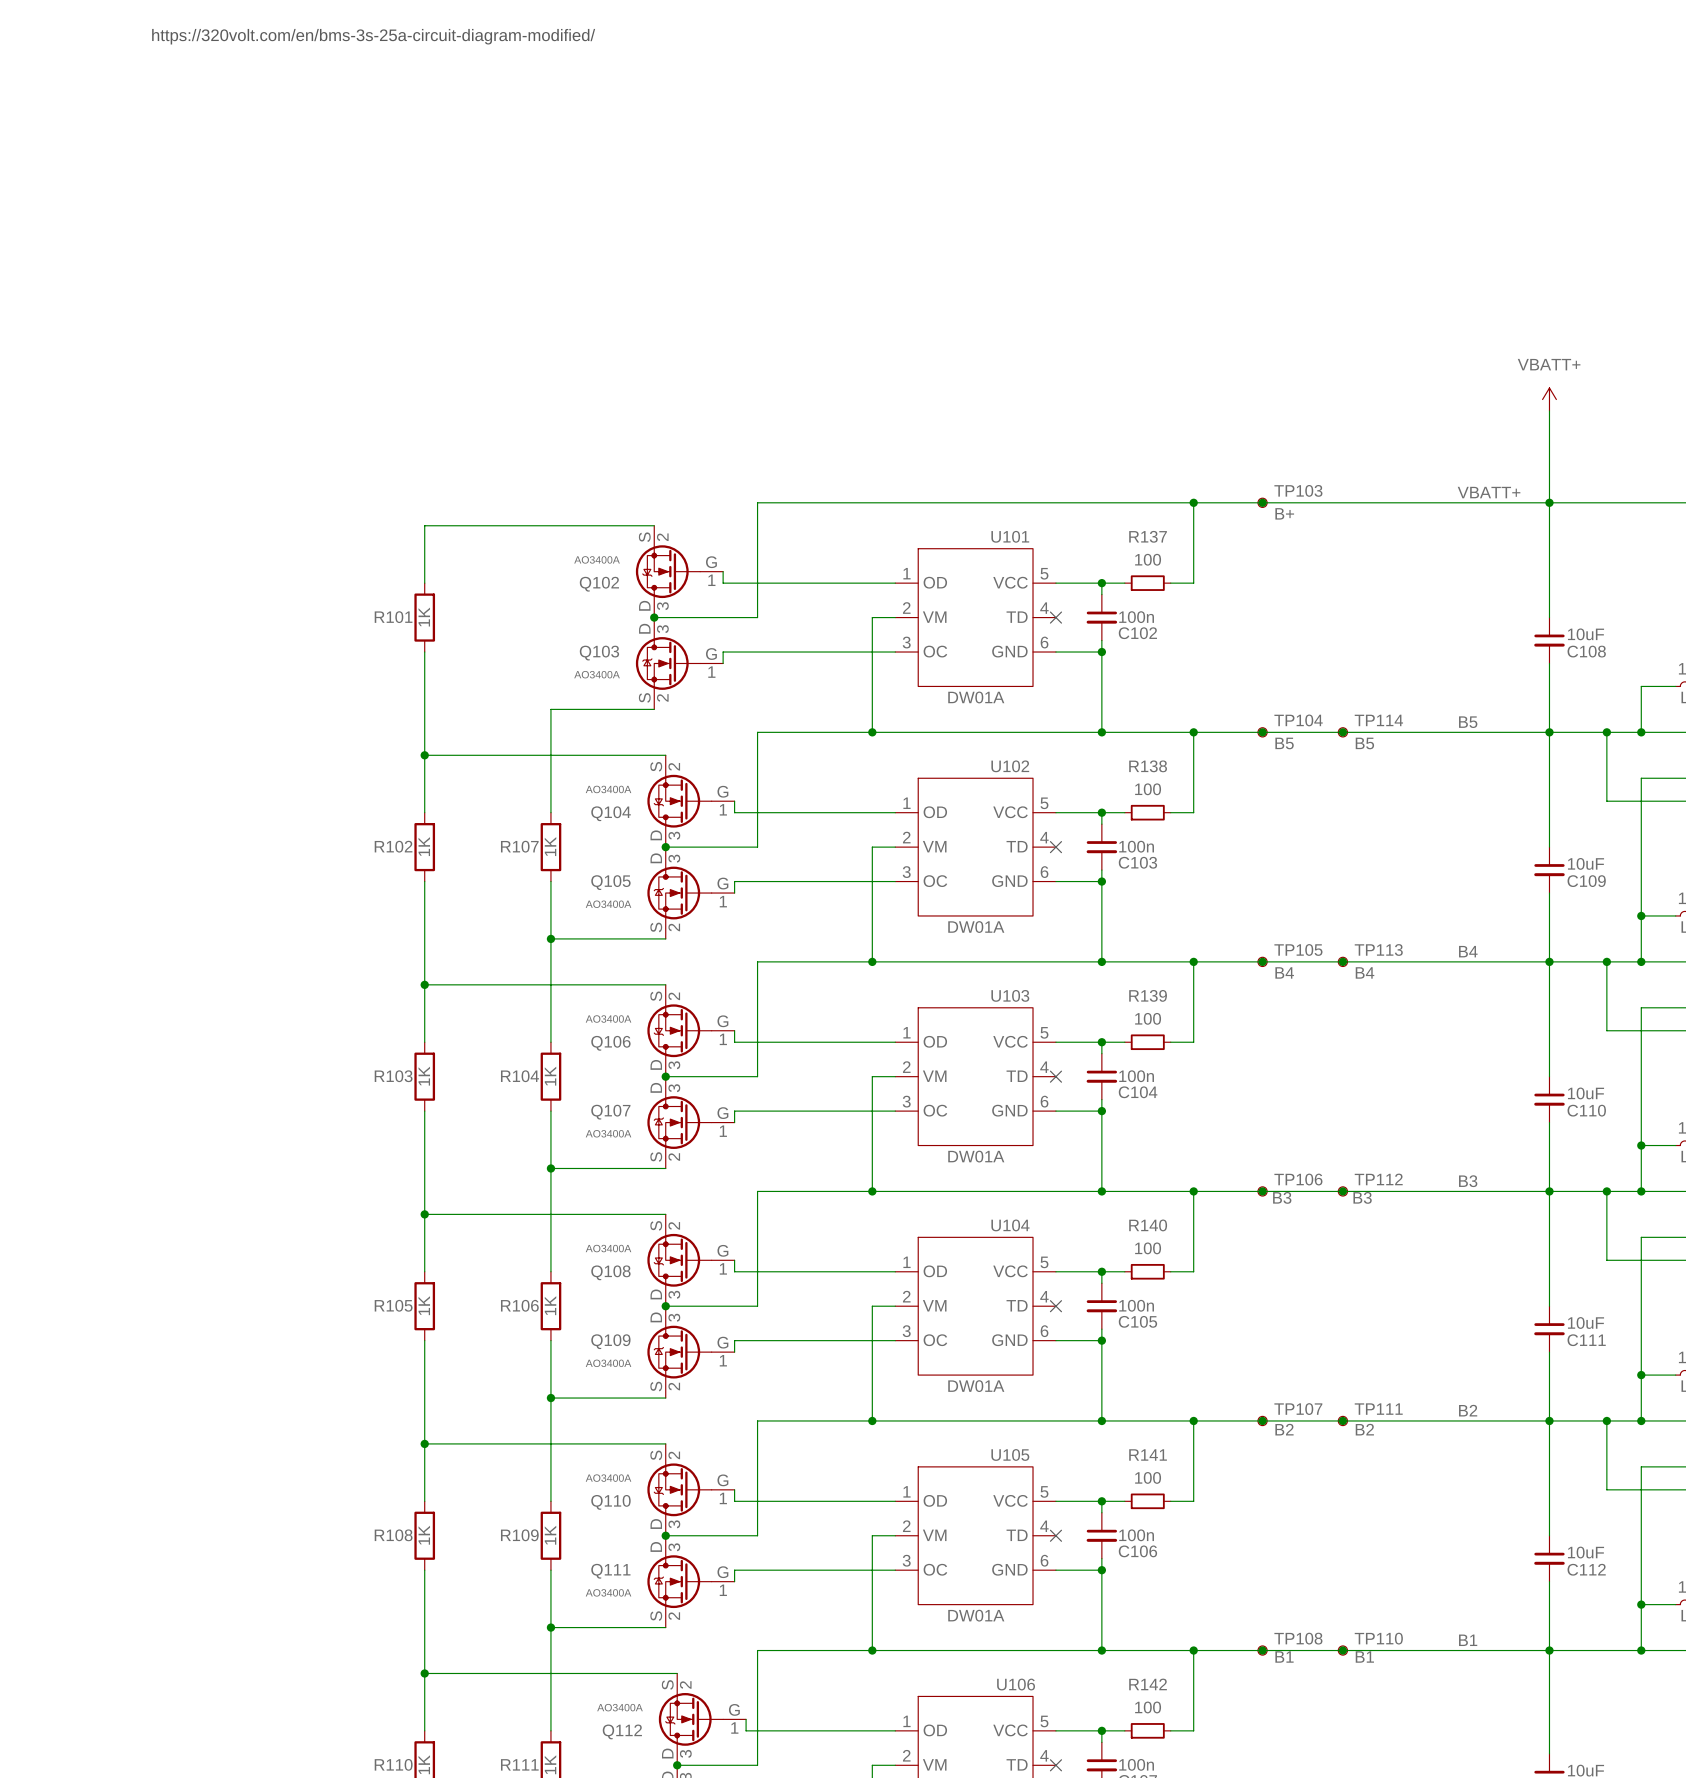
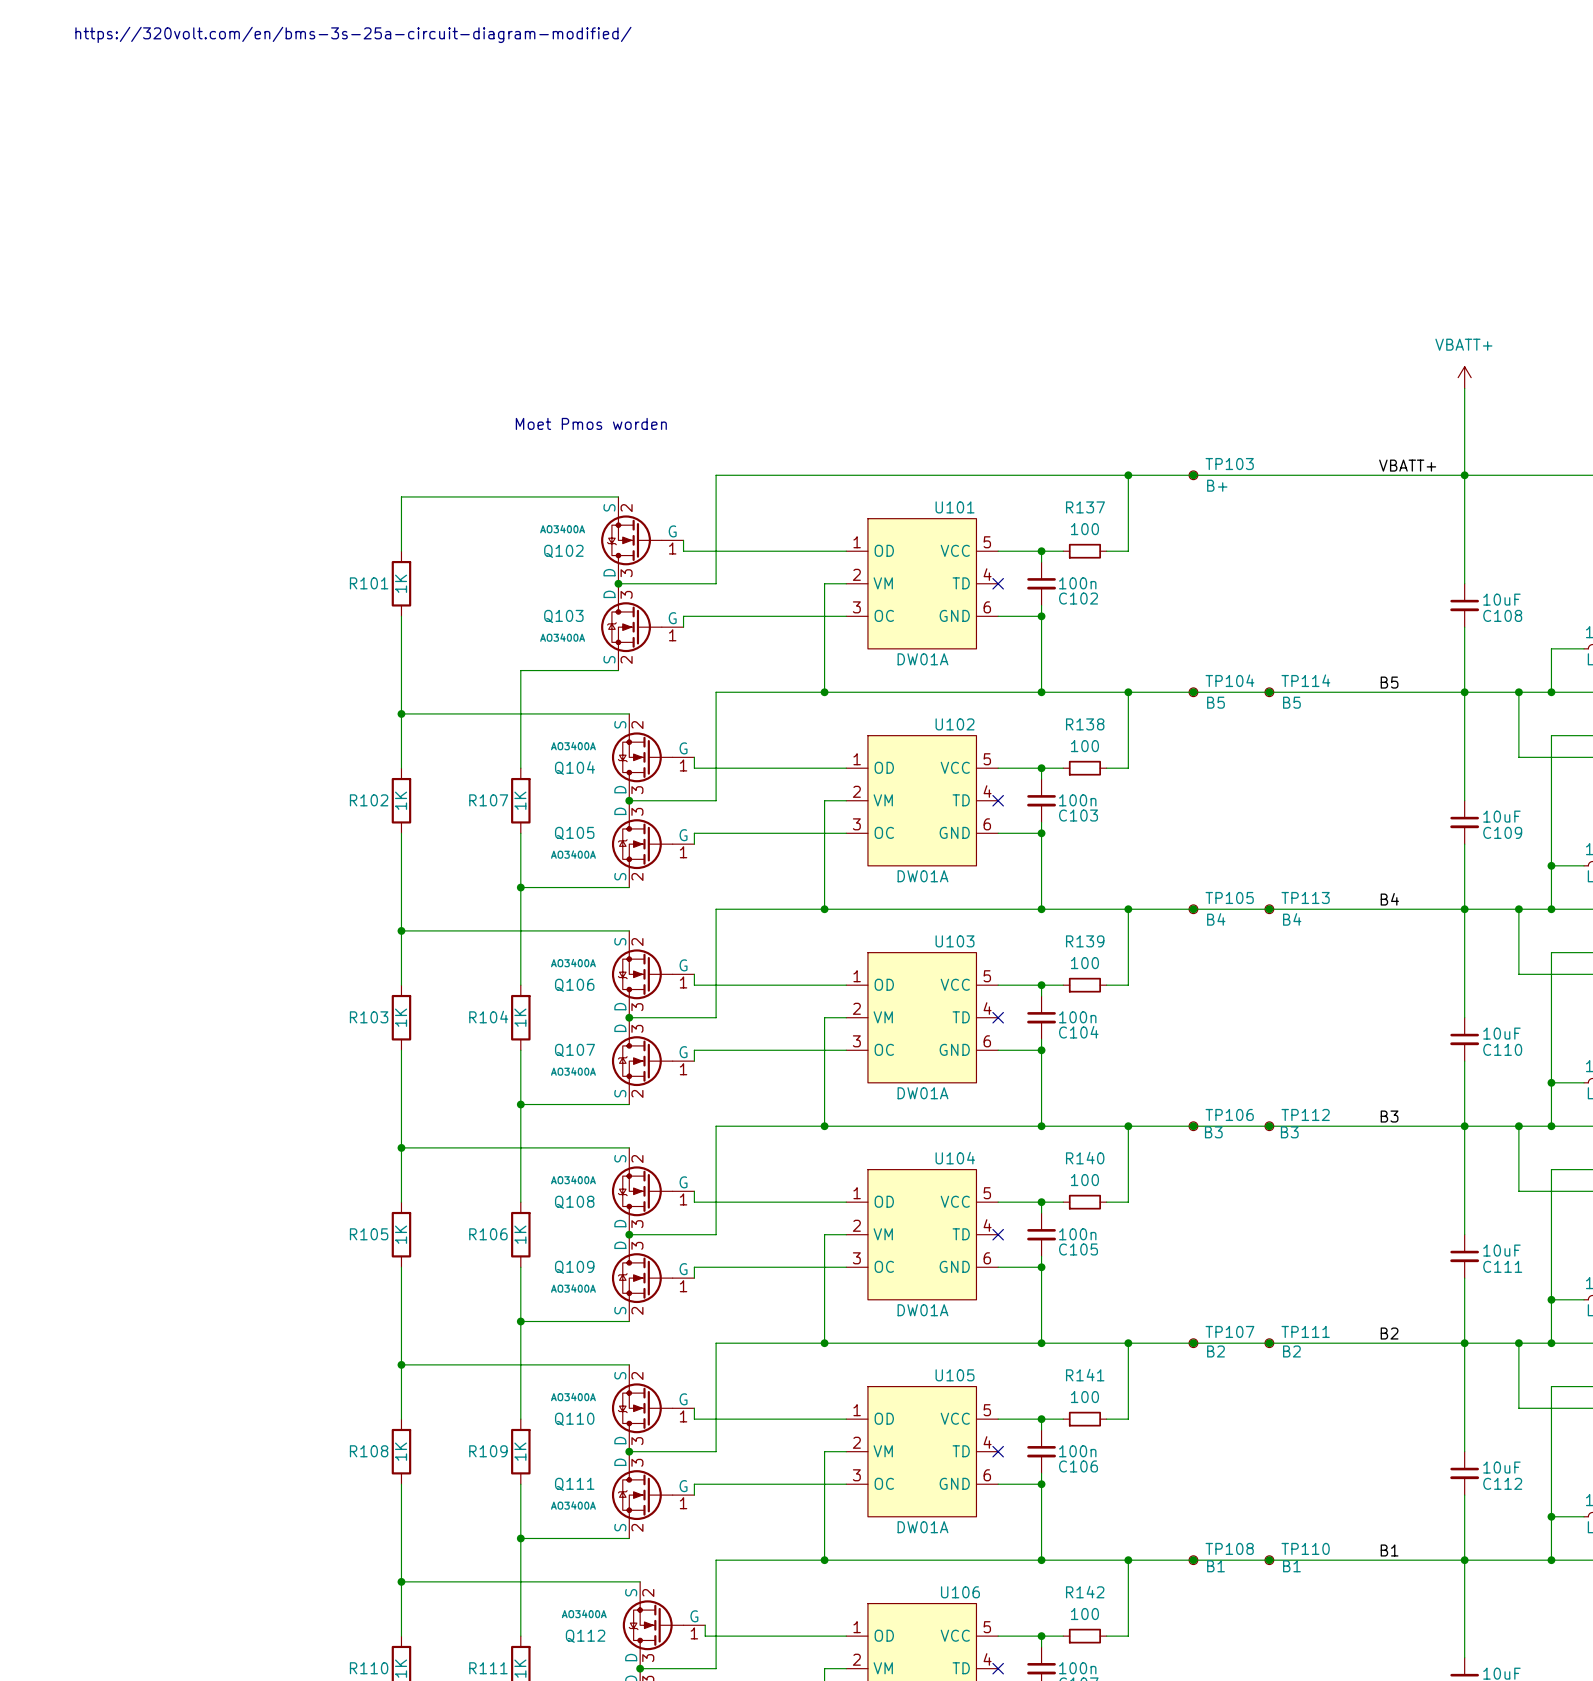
text: none -> Moet Pmos worden (591, 423)

